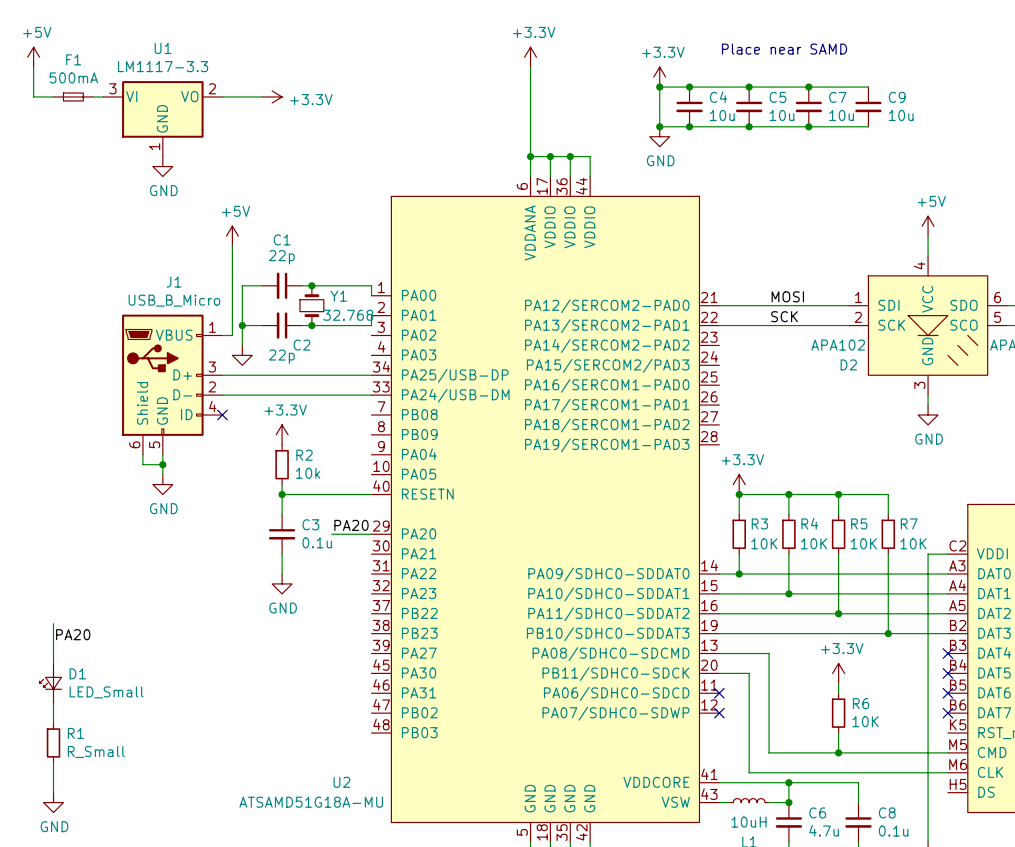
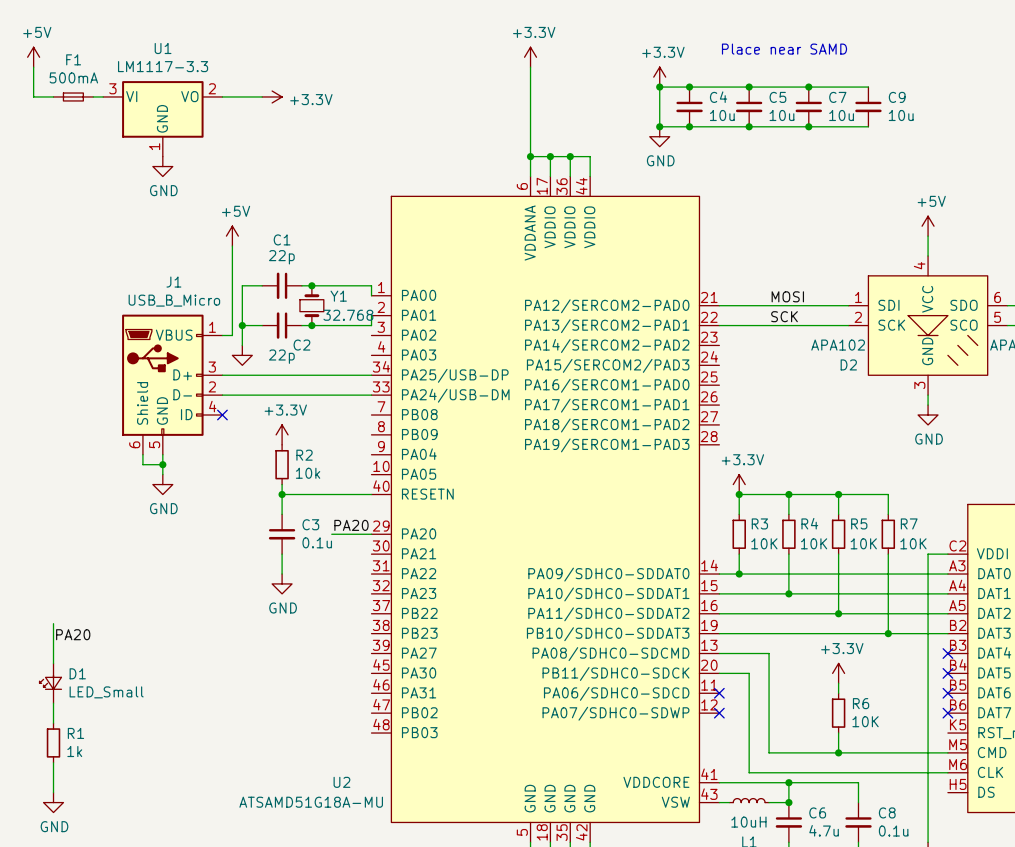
R1 value: R_Small (96, 752) -> 1k (74, 751)

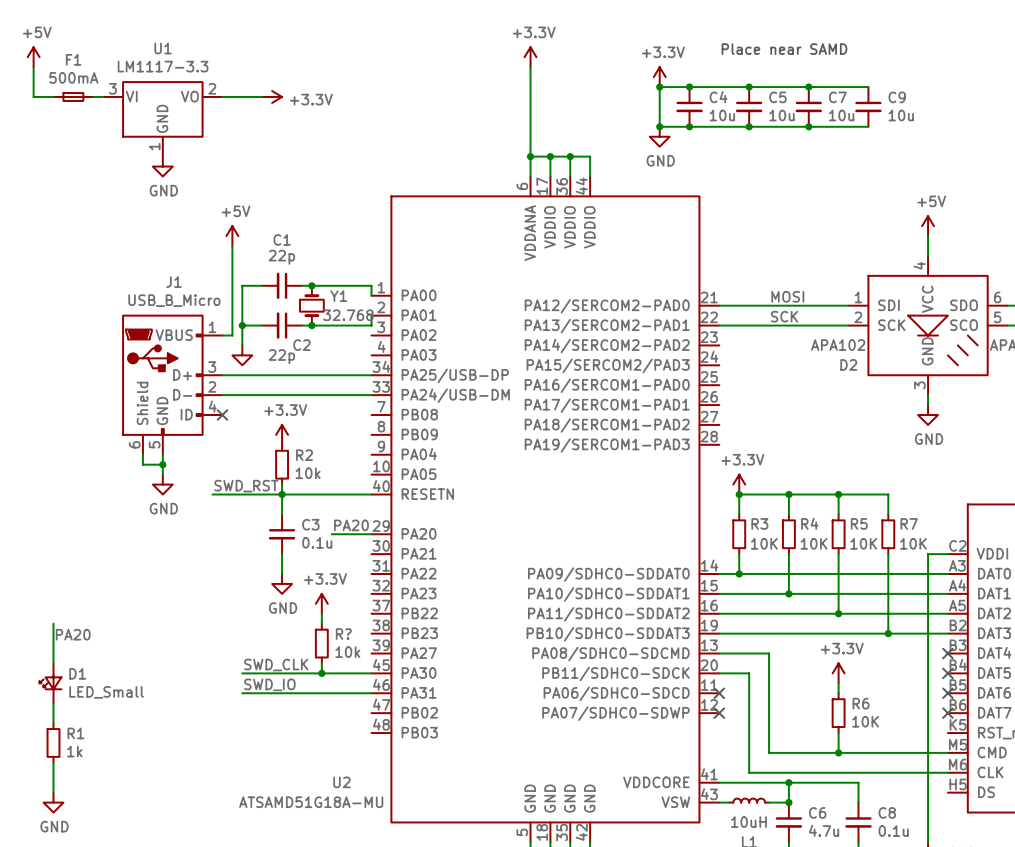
label: none -> SWD_RST (246, 486)
wire: none -> (212, 494) (282, 494)
power symbol: none -> +3.3V (321, 603)
wire: none -> (321, 613) (321, 623)
R?: none -> 10k (321, 643)
wire: none -> (321, 663) (321, 673)
label: none -> SWD_CLK (276, 664)
wire: none -> (242, 673) (371, 673)
junction: none -> (321, 673)
label: none -> SWD_IO (269, 684)
wire: none -> (242, 693) (371, 693)

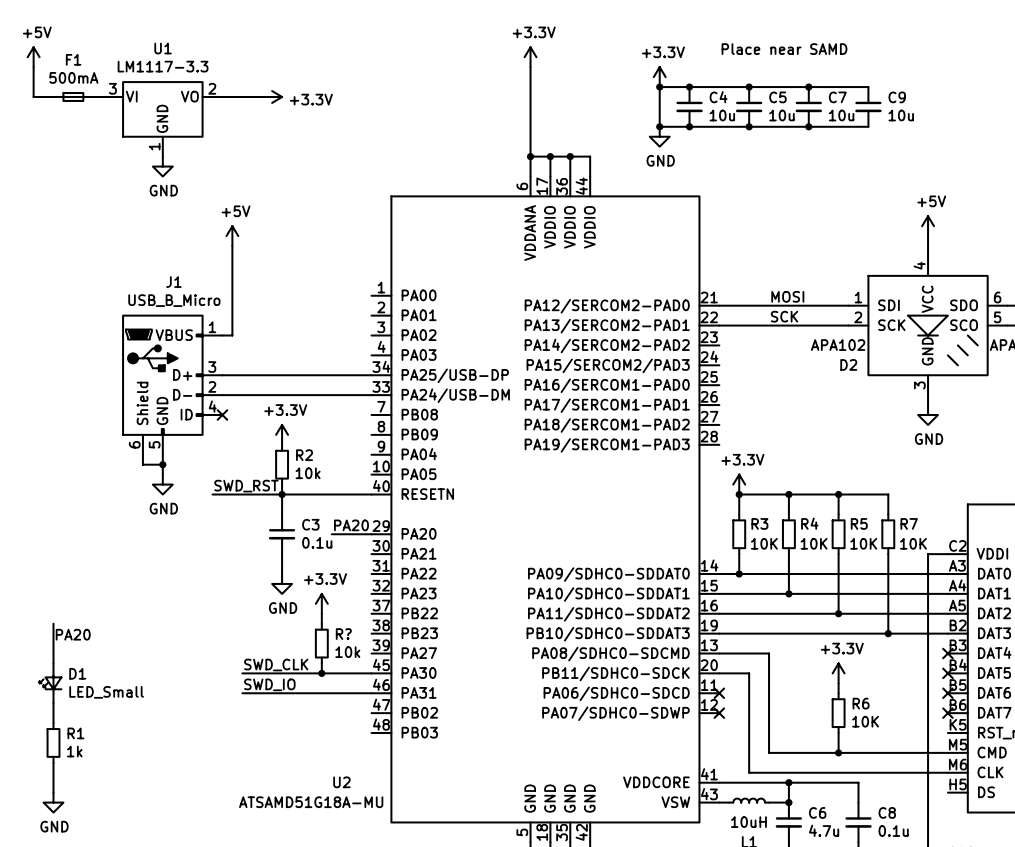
wire: (262, 285) (242, 285) (242, 345) -> none
C1: 22p (282, 285) -> none
wire: (301, 285) (371, 285) (371, 295) -> none
junction: (311, 285) -> none
Y1: 32.768 (311, 305) -> none
wire: (371, 315) (371, 325) (301, 325) -> none
wire: (242, 325) (262, 325) -> none
junction: (242, 325) -> none
C2: 22p (282, 325) -> none
junction: (311, 325) -> none
power symbol: (242, 355) -> none

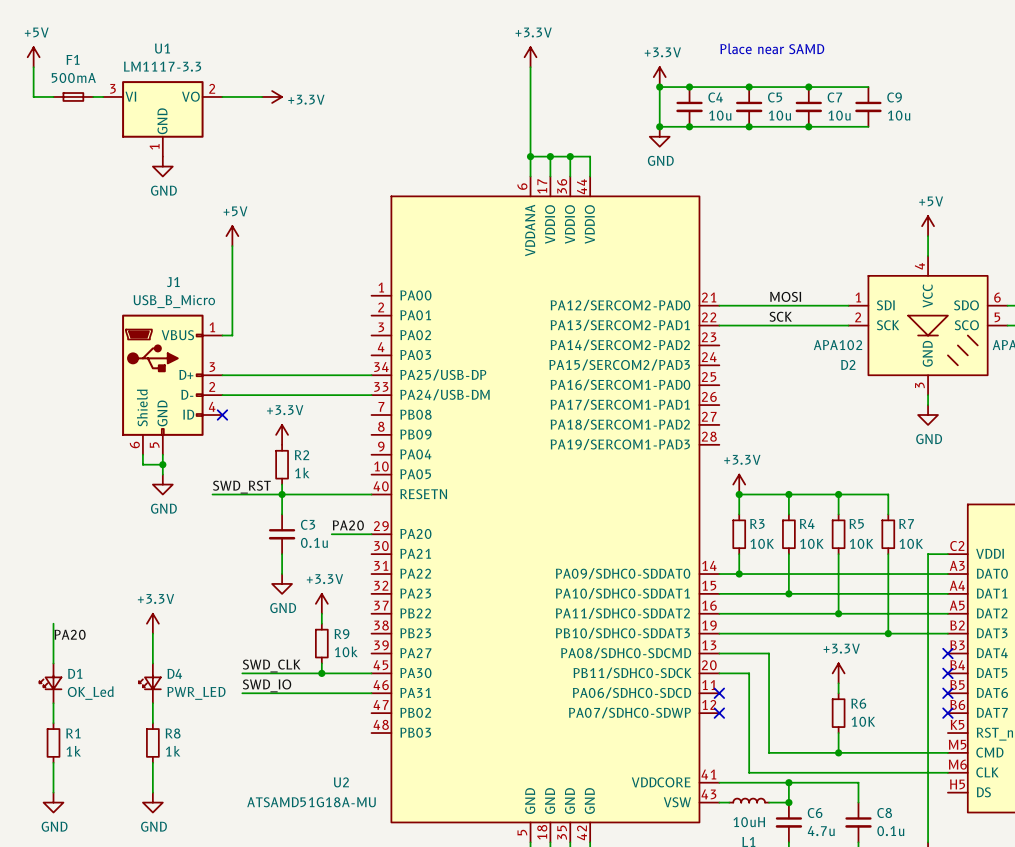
R2 value: 10k (308, 473) -> 1k (302, 472)
power symbol: none -> +3.3V (152, 623)
wire: none -> (152, 633) (152, 663)
R? name: R? (343, 634) -> R9 (341, 634)
D4: none -> PWR_LED (149, 683)
D1 value: LED_Small (106, 692) -> OK_Led (90, 693)
wire: none -> (152, 703) (152, 723)
R8: none -> 1k (152, 742)
wire: none -> (152, 762) (152, 792)
power symbol: none -> GND (152, 802)

